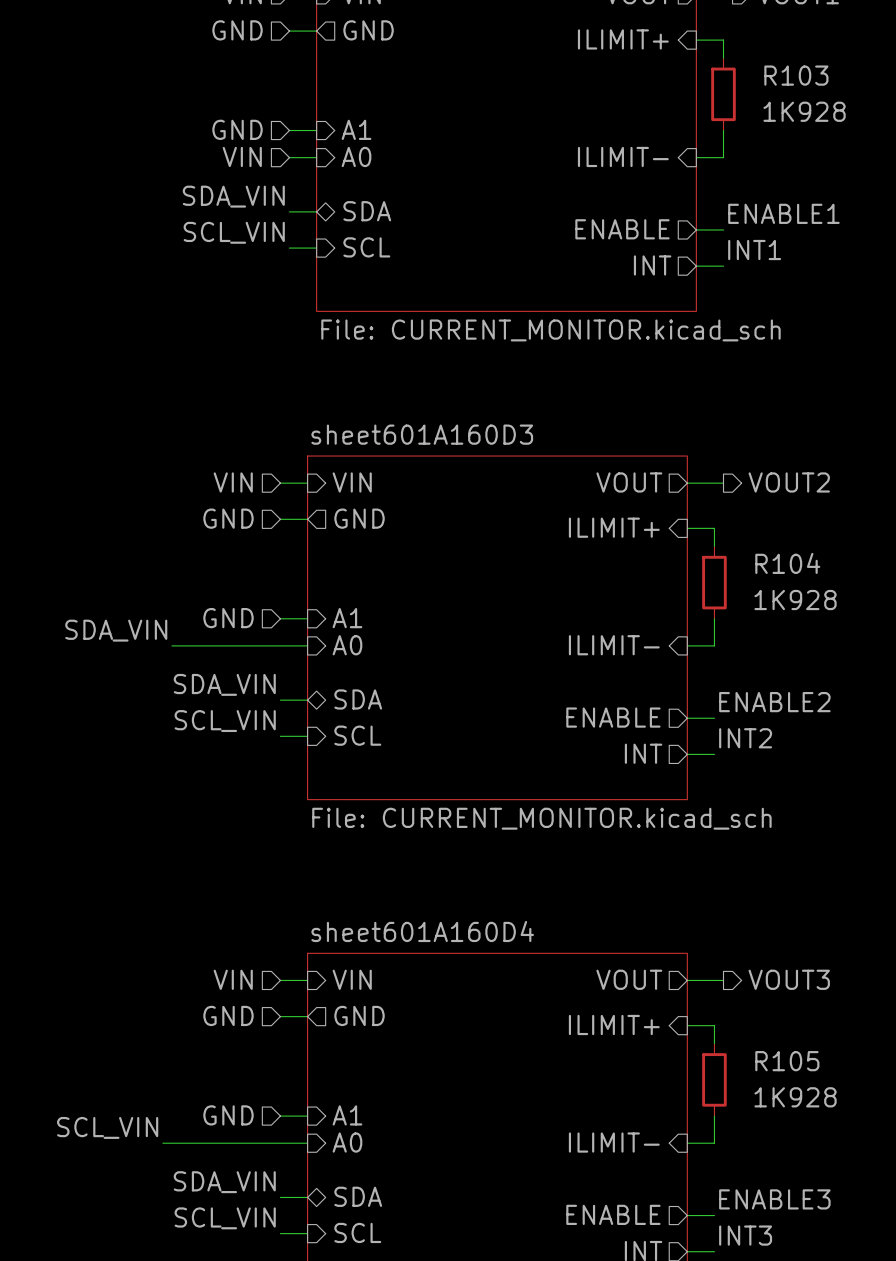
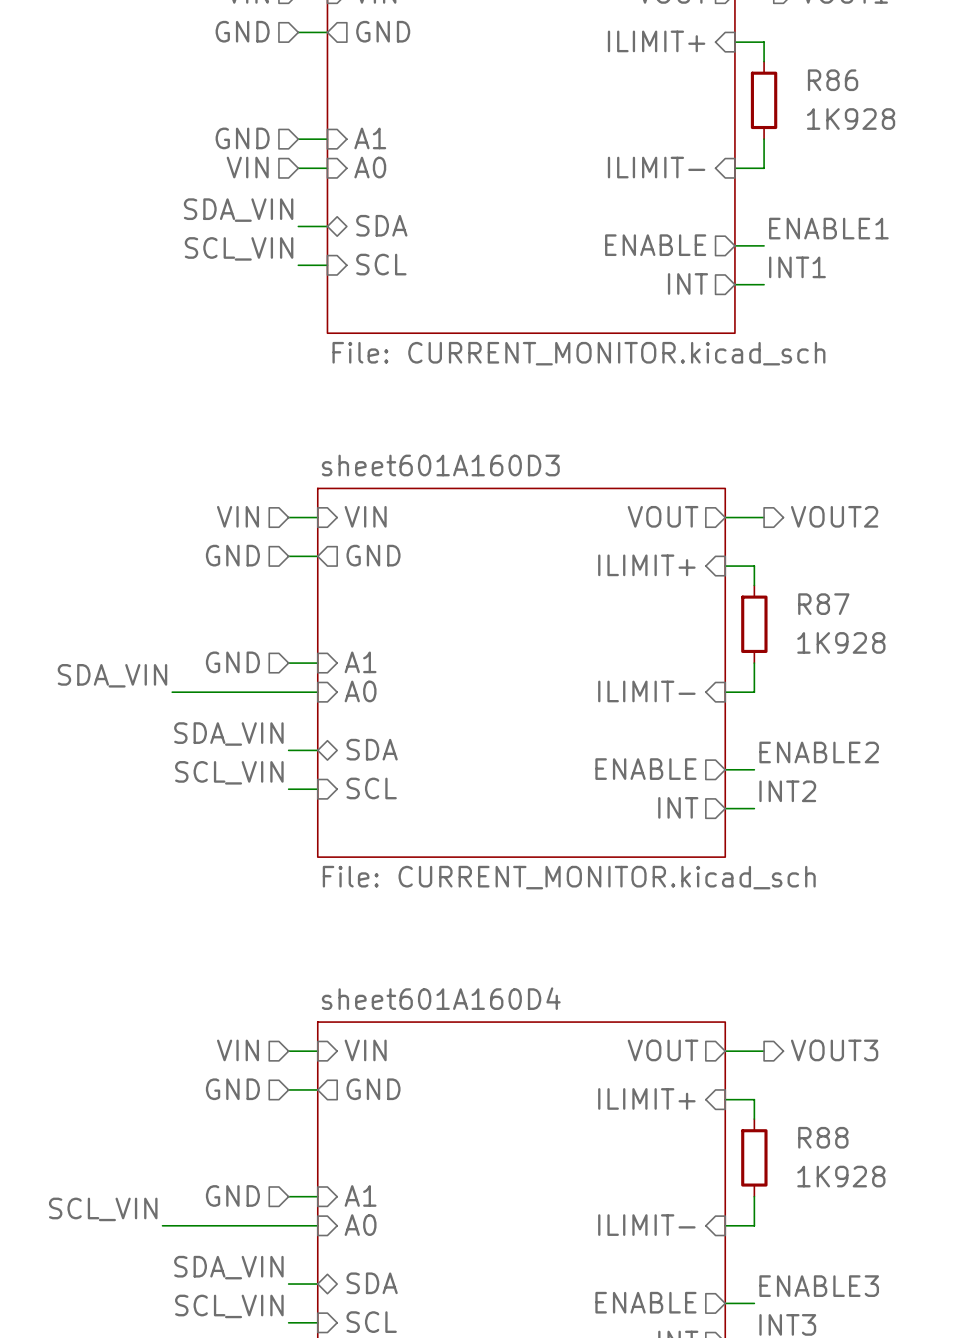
R103 name: R103 (796, 75) -> R86 (833, 80)
R104 name: R104 (787, 563) -> R87 (823, 604)
R105 name: R105 (787, 1061) -> R88 (823, 1137)

